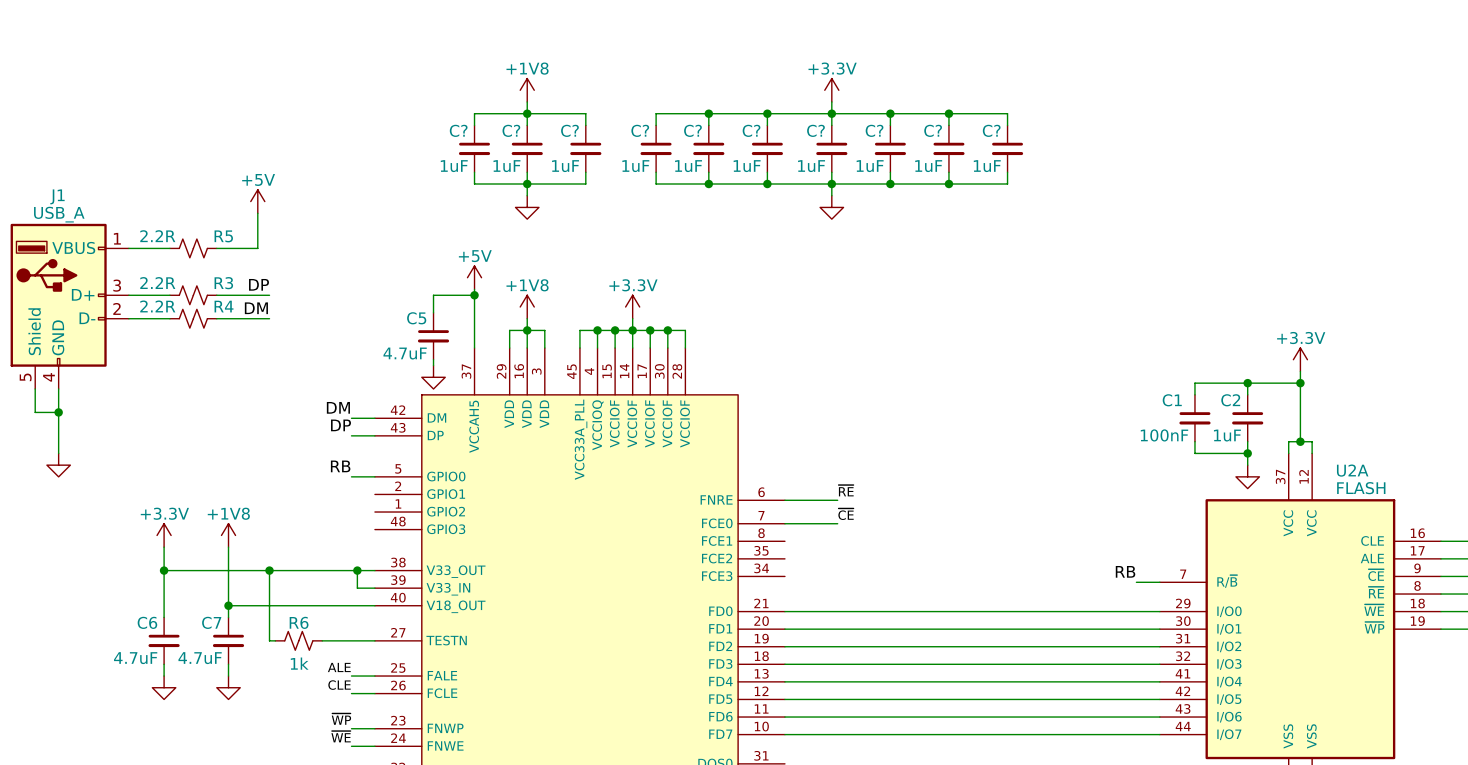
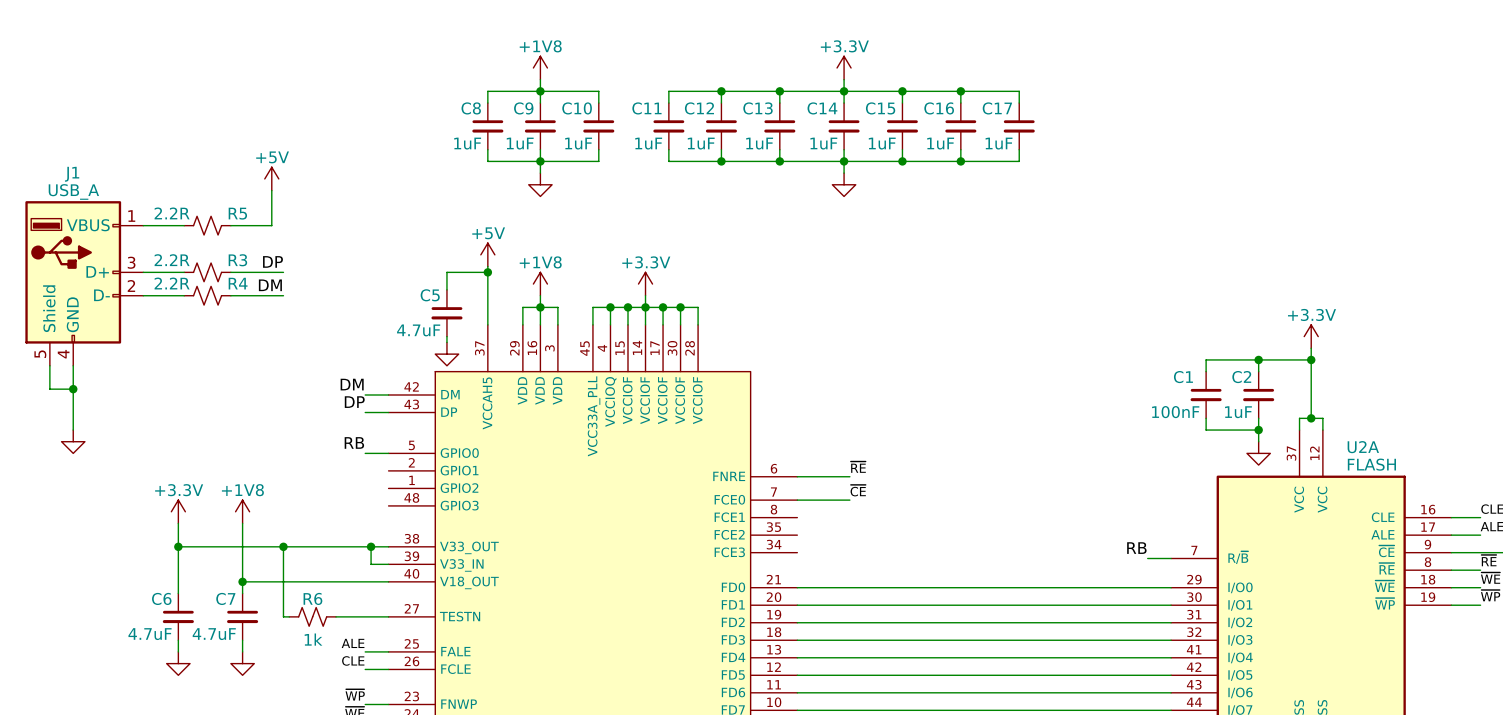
C? name: C? (458, 130) -> C8 (471, 108)
C? name: C? (511, 130) -> C9 (523, 108)
C? name: C? (569, 130) -> C10 (577, 108)
C? name: C? (640, 130) -> C11 (646, 108)
C? name: C? (692, 130) -> C12 (699, 108)
C? name: C? (751, 130) -> C13 (758, 108)
C? name: C? (815, 130) -> C14 (822, 108)
C? name: C? (874, 130) -> C15 (880, 108)
C? name: C? (933, 130) -> C16 (939, 108)
C? name: C? (991, 130) -> C17 (997, 108)

